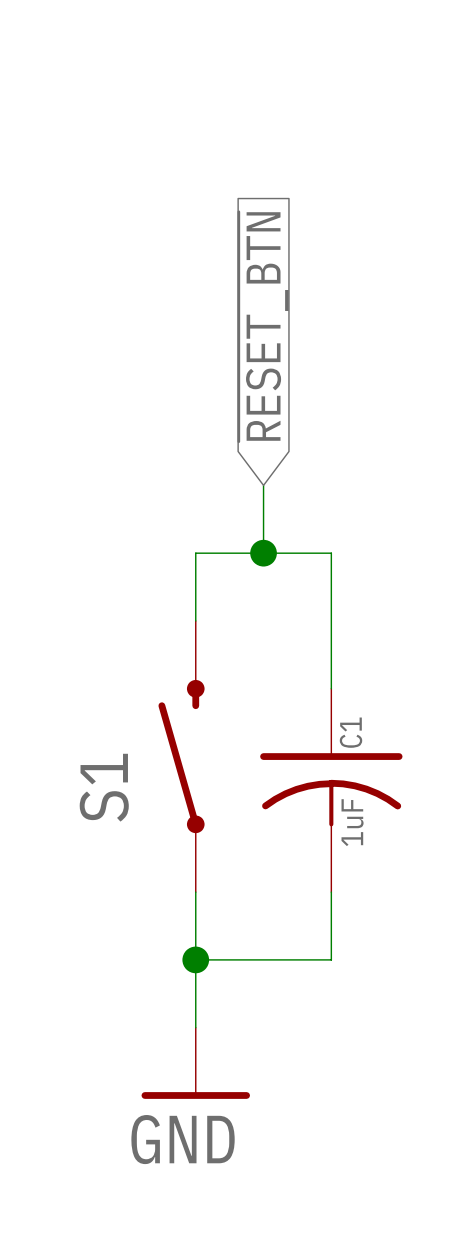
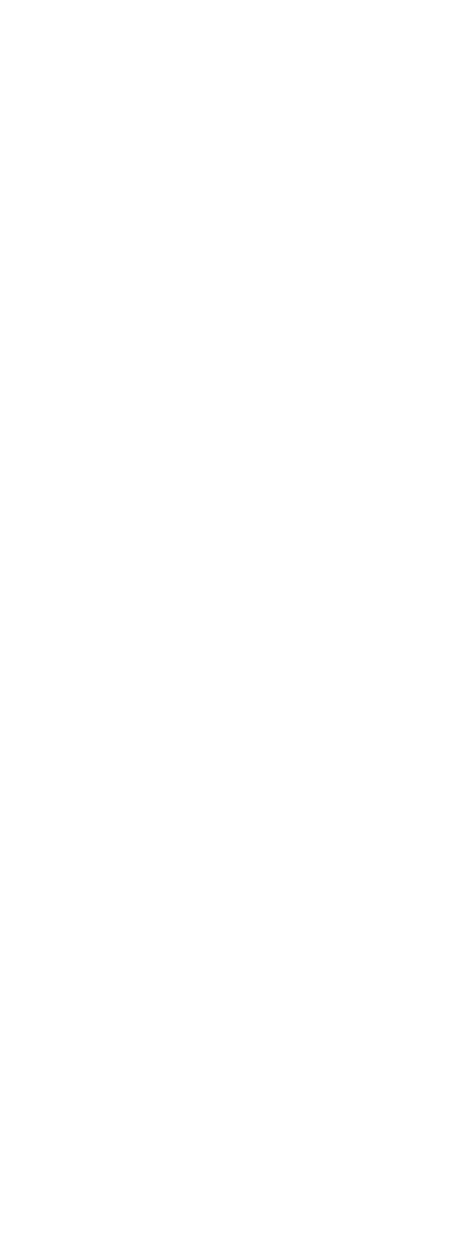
global label: ~{RESET_BTN} (263, 326) -> none
wire: (263, 485) (263, 553) -> none
junction: (263, 553) -> none
wire: (195, 620) (195, 553) (331, 553) (331, 688) -> none
S1: (181, 756) -> none
C1: 1uF (331, 790) -> none
wire: (195, 892) (195, 1027) -> none
wire: (331, 892) (331, 959) (195, 959) -> none
junction: (195, 959) -> none
power symbol: GND (195, 1063) -> none

